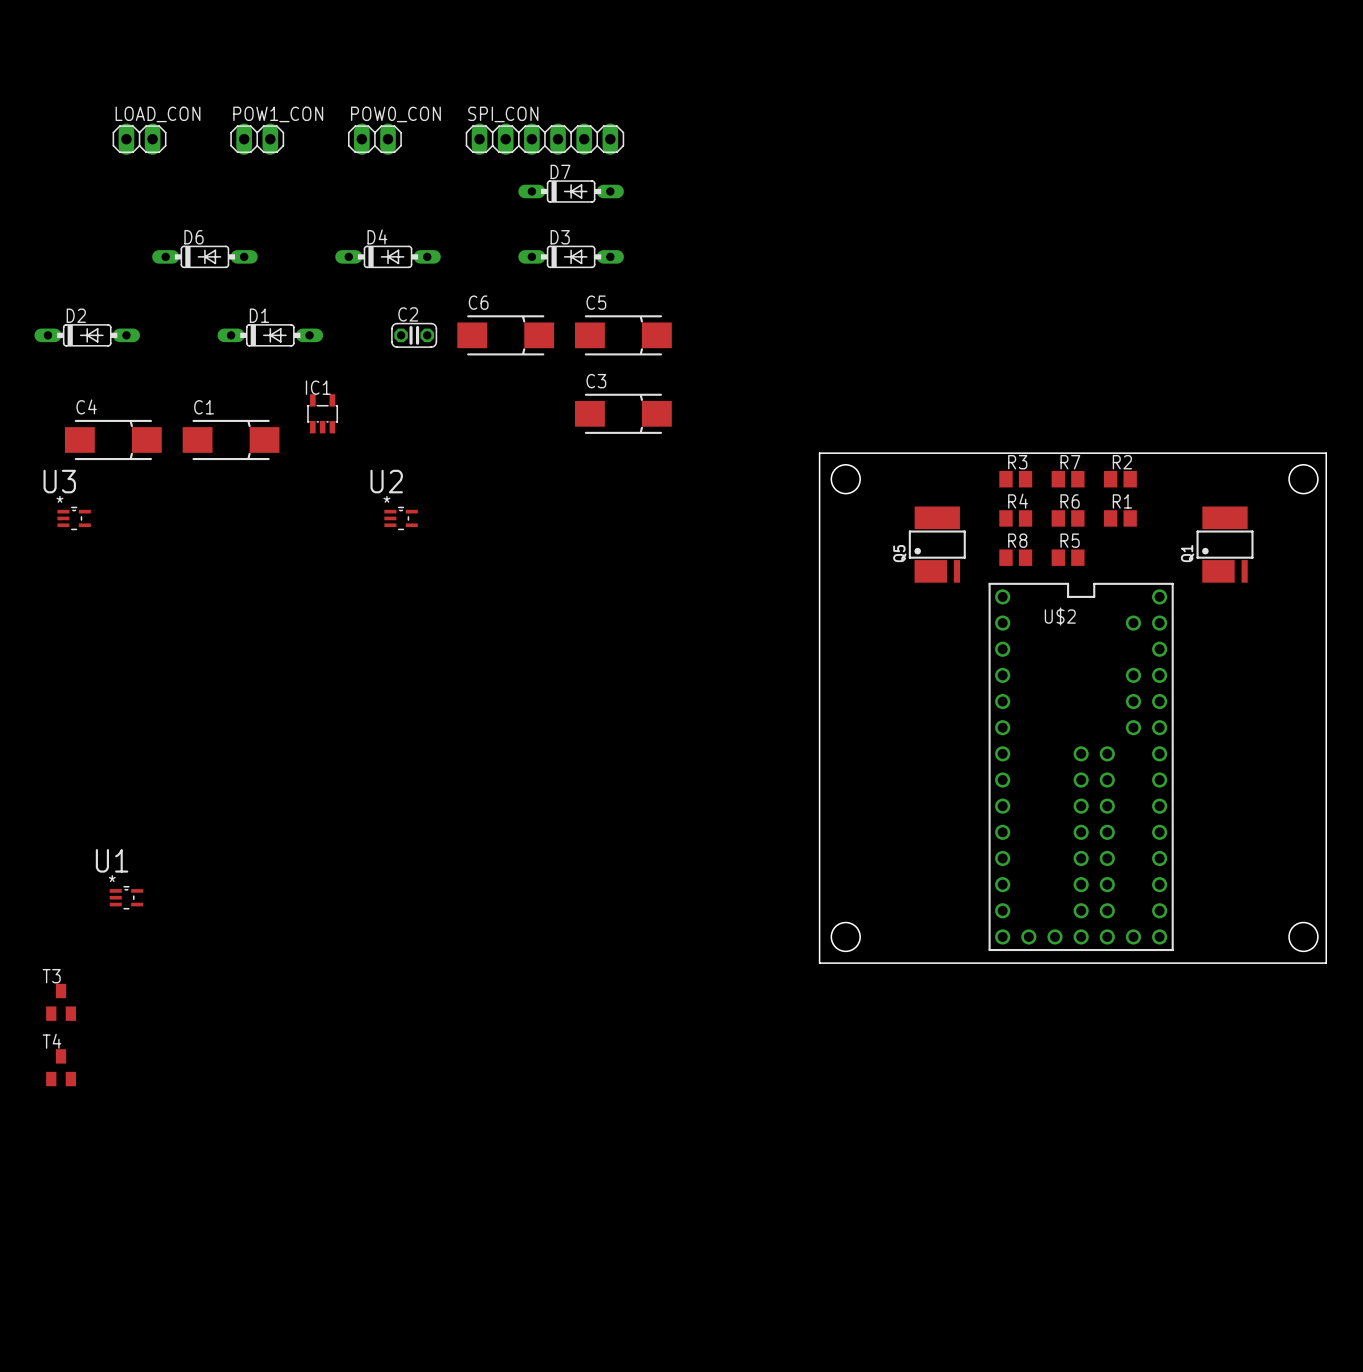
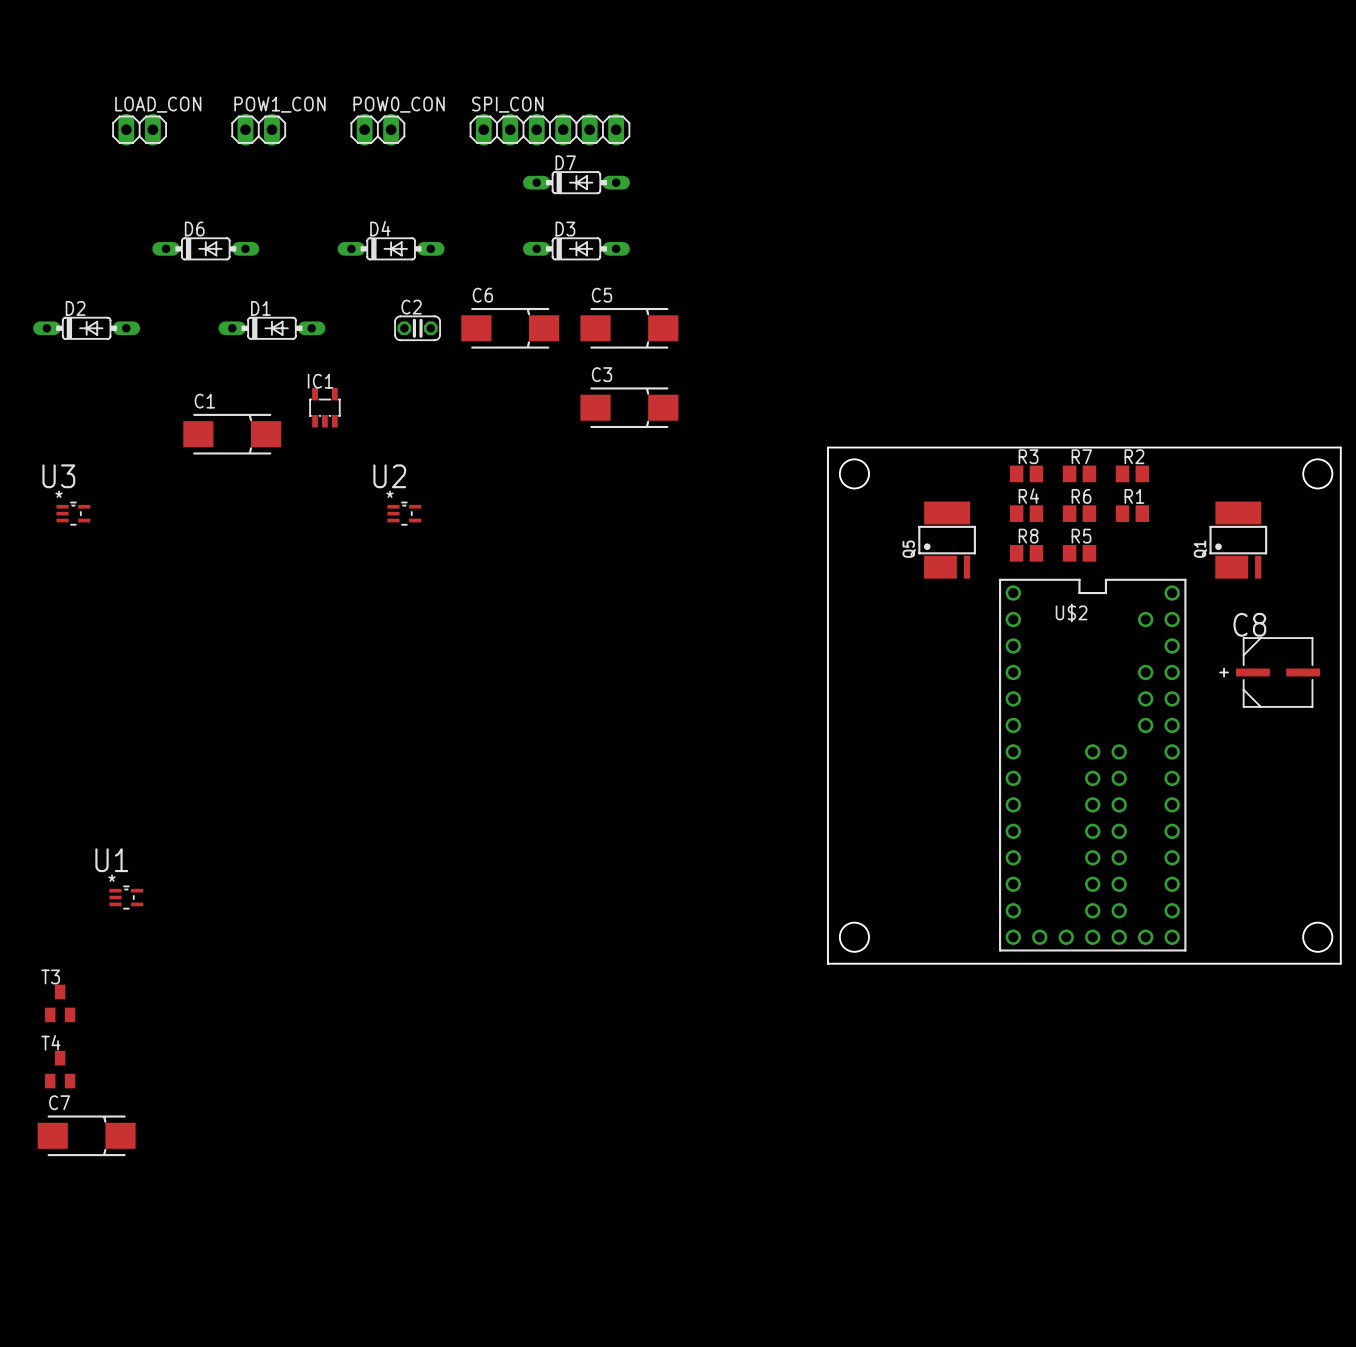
C4: (113, 439) -> none
C8: none -> (1269, 672)
C7: none -> (86, 1135)

